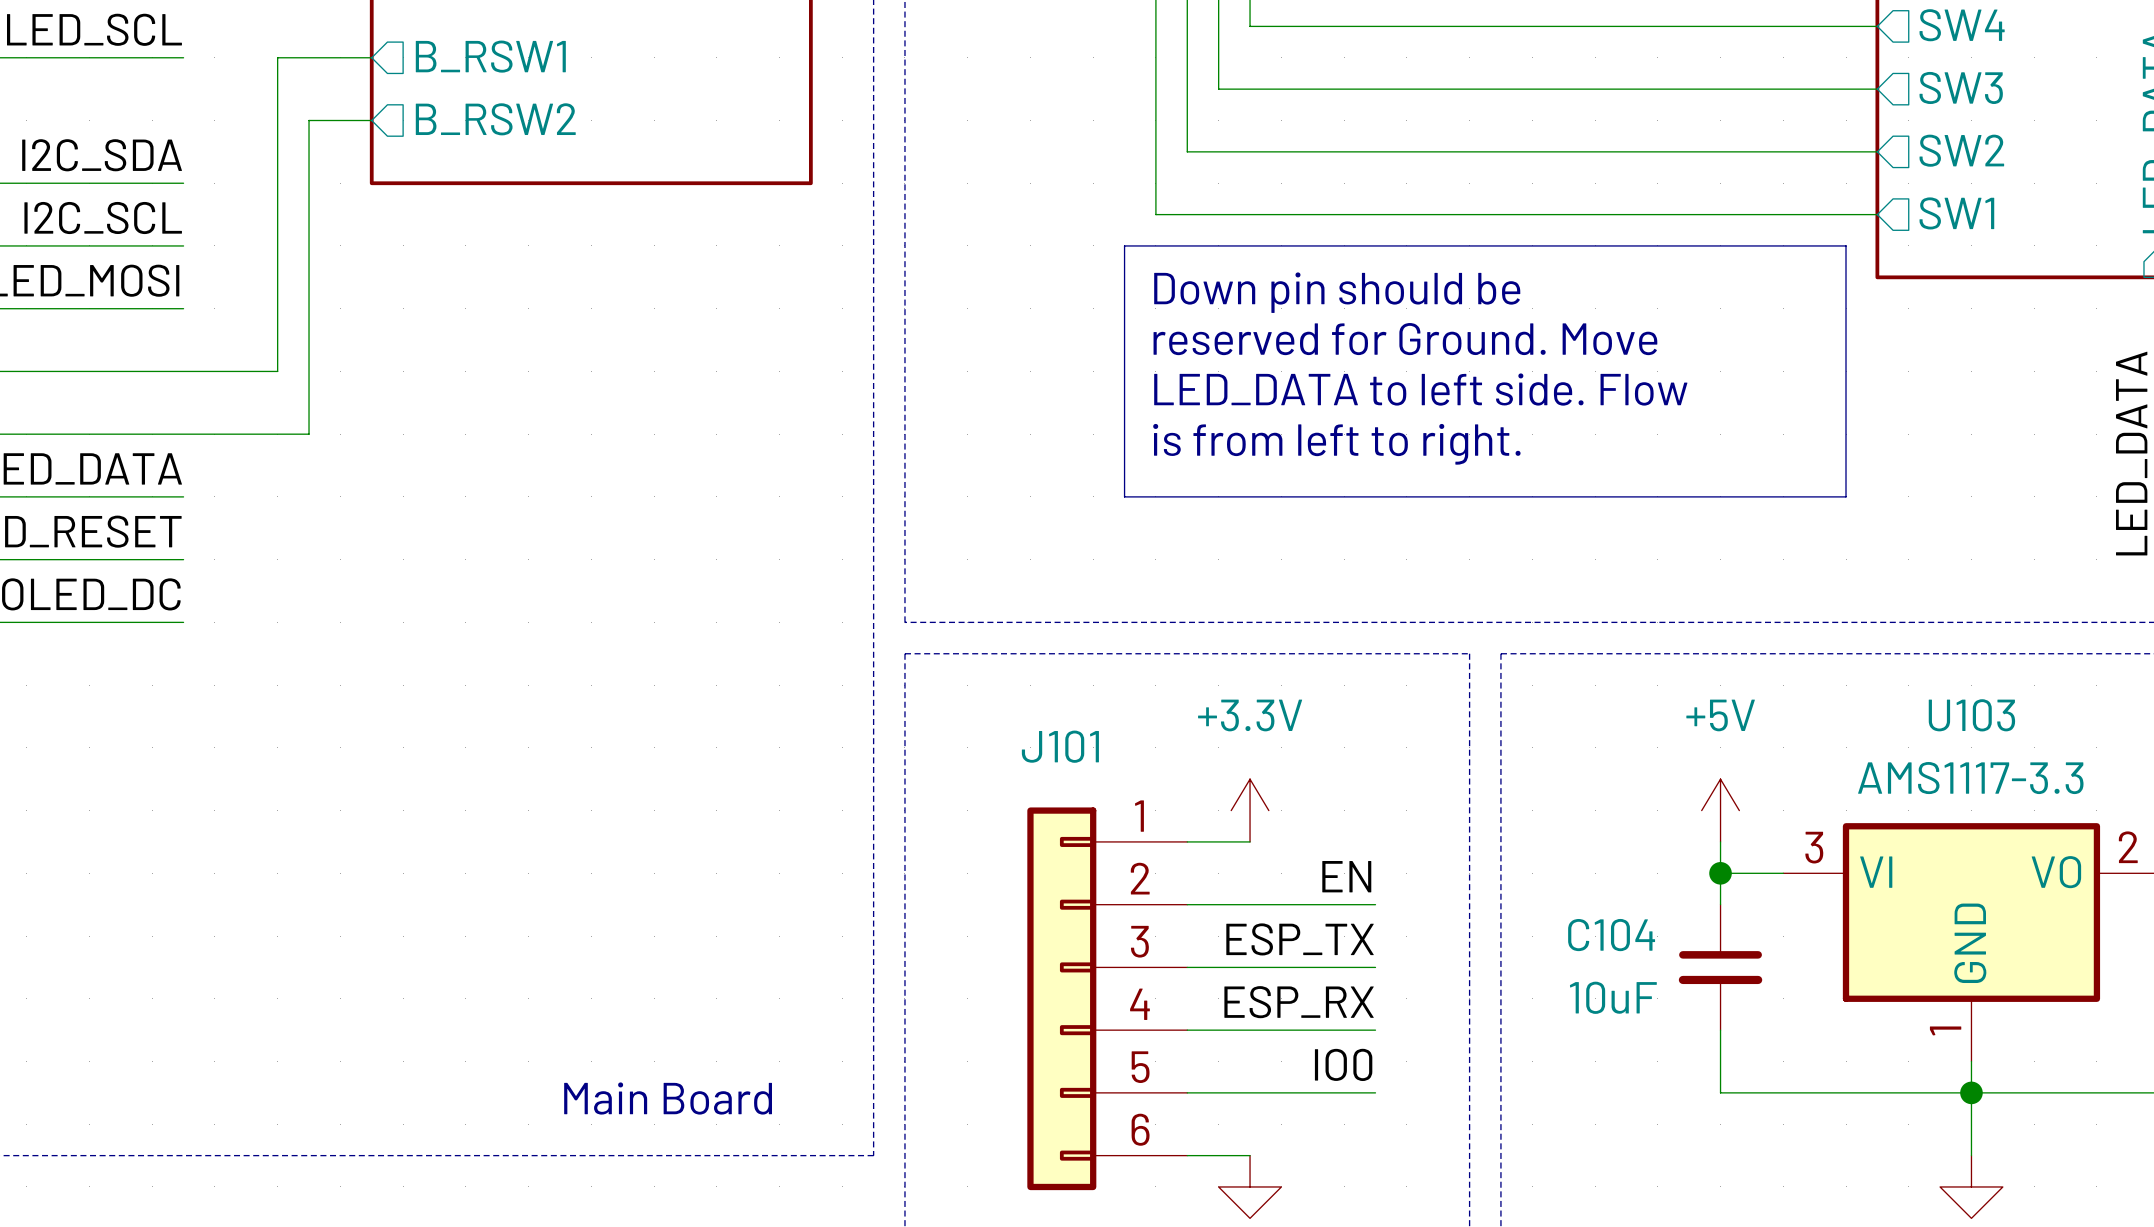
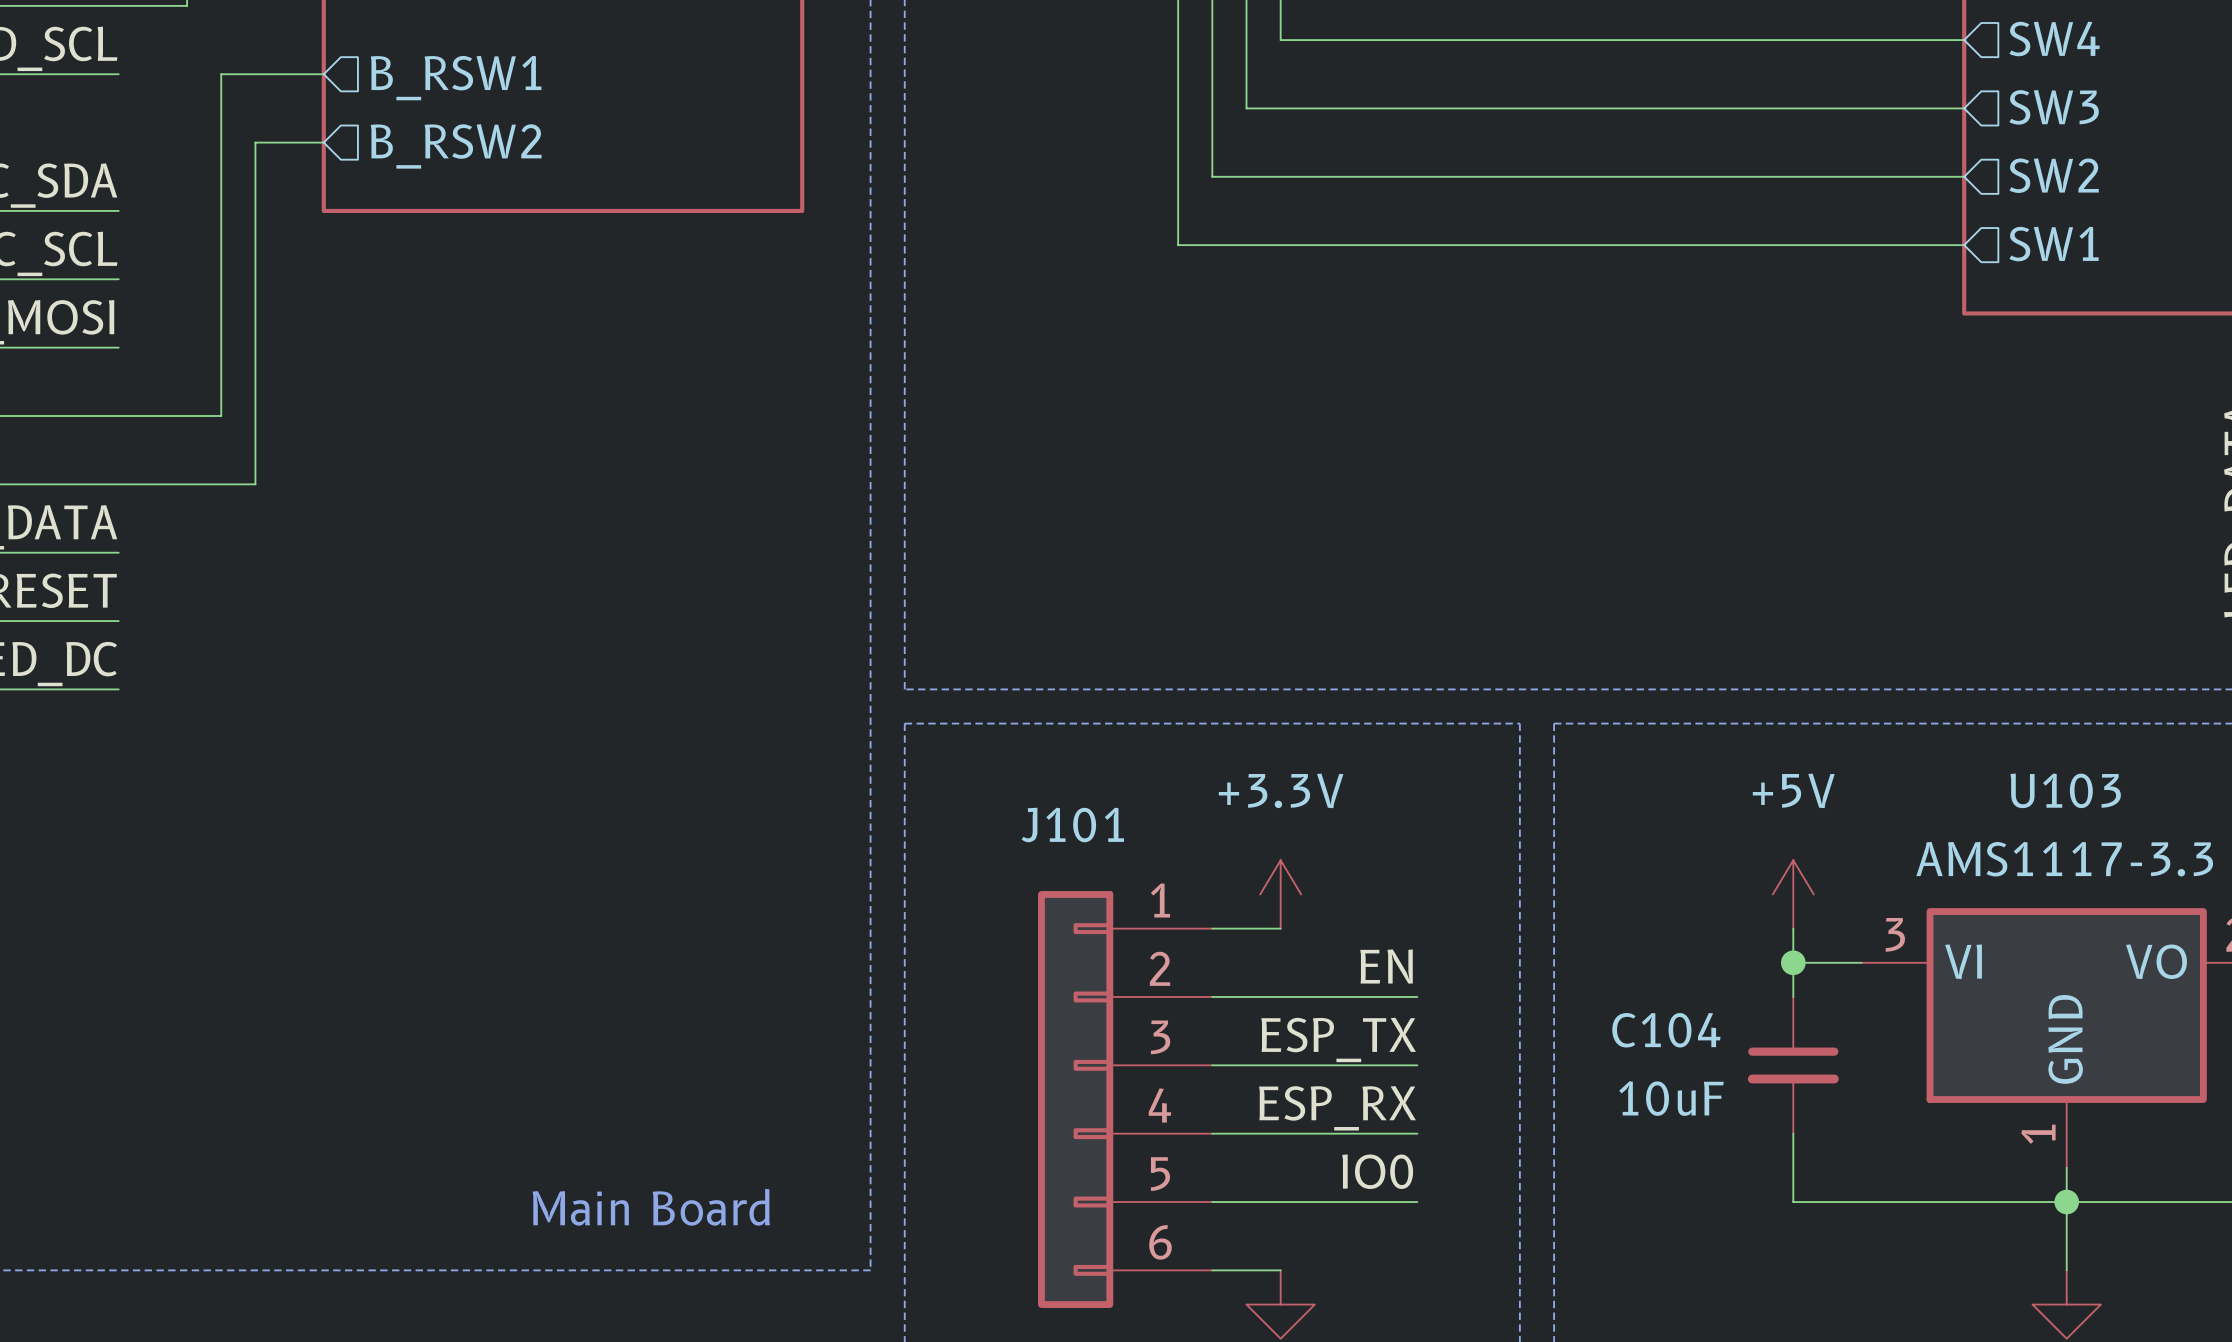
line: (1124, 245) (1846, 245) (1846, 496) (1124, 496) (1124, 245) -> none
text: Down pin should be (1337, 292) -> none
text: reserved for Ground. Move (1405, 339) -> none
text: LED_DATA to left side. Flow (1420, 389) -> none
text: is from left to right. (1336, 444) -> none

